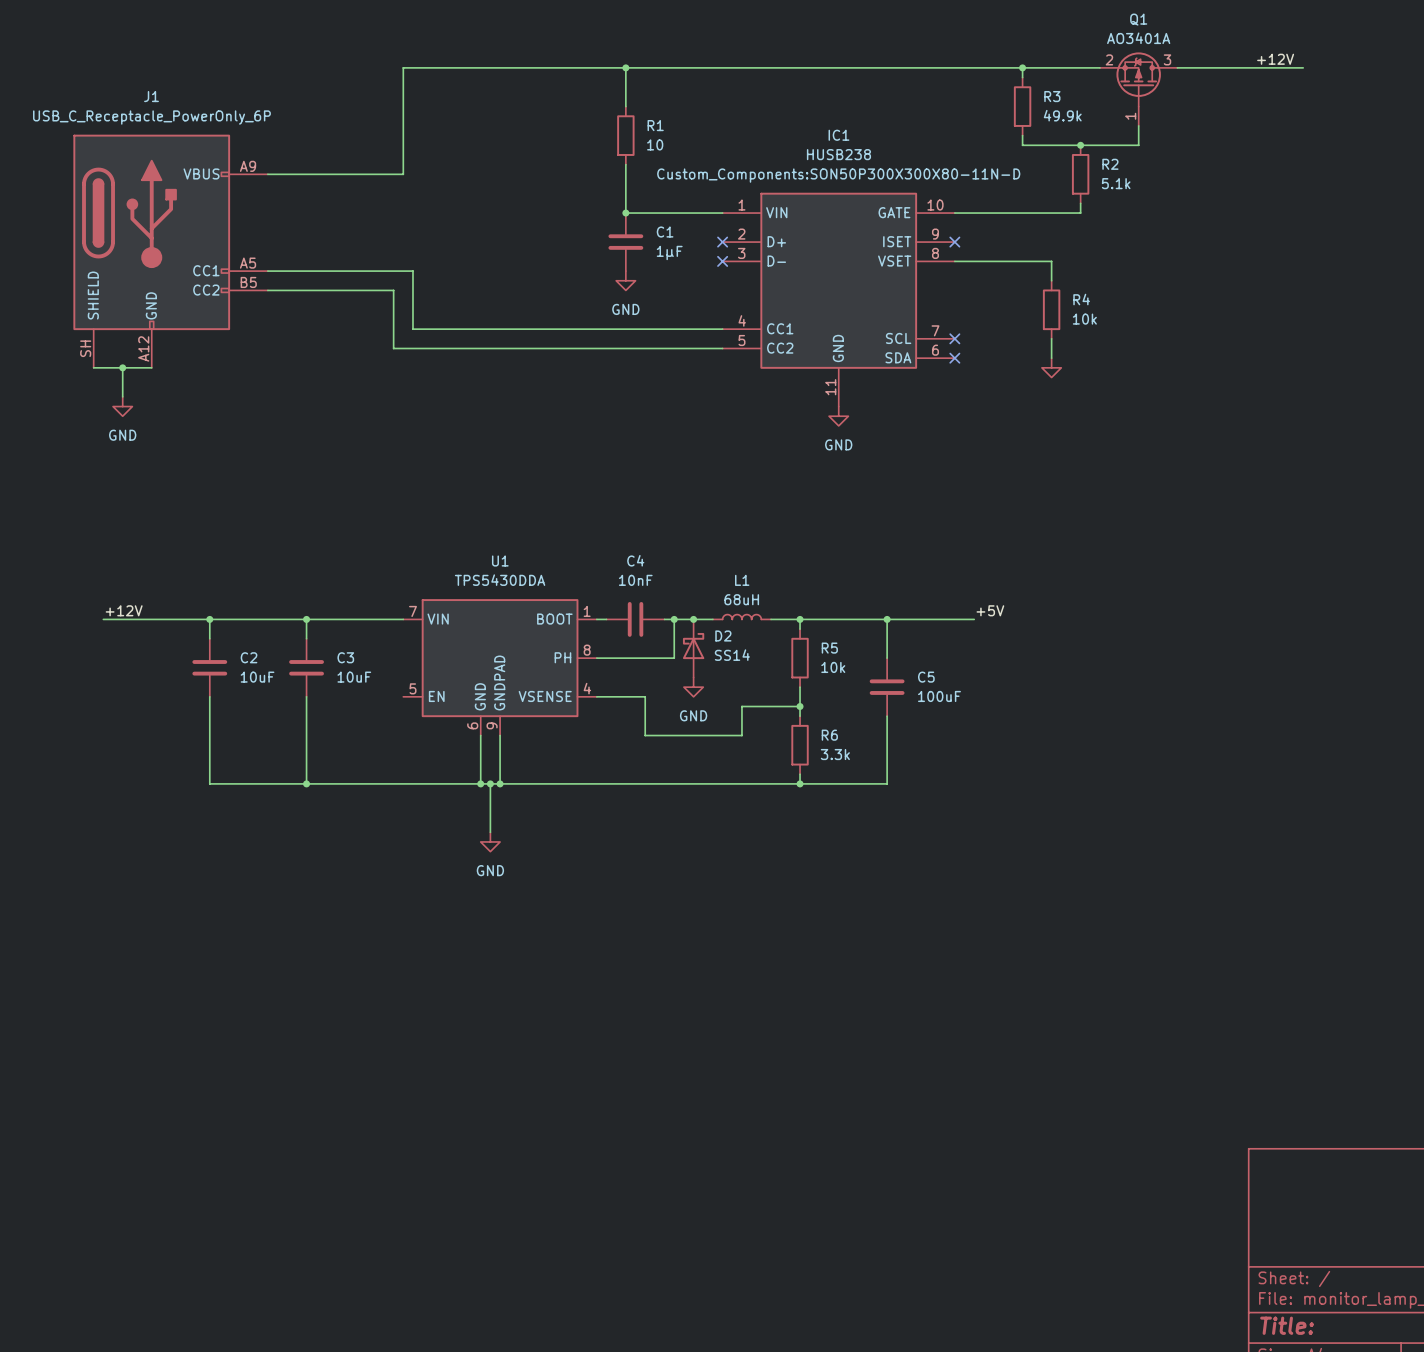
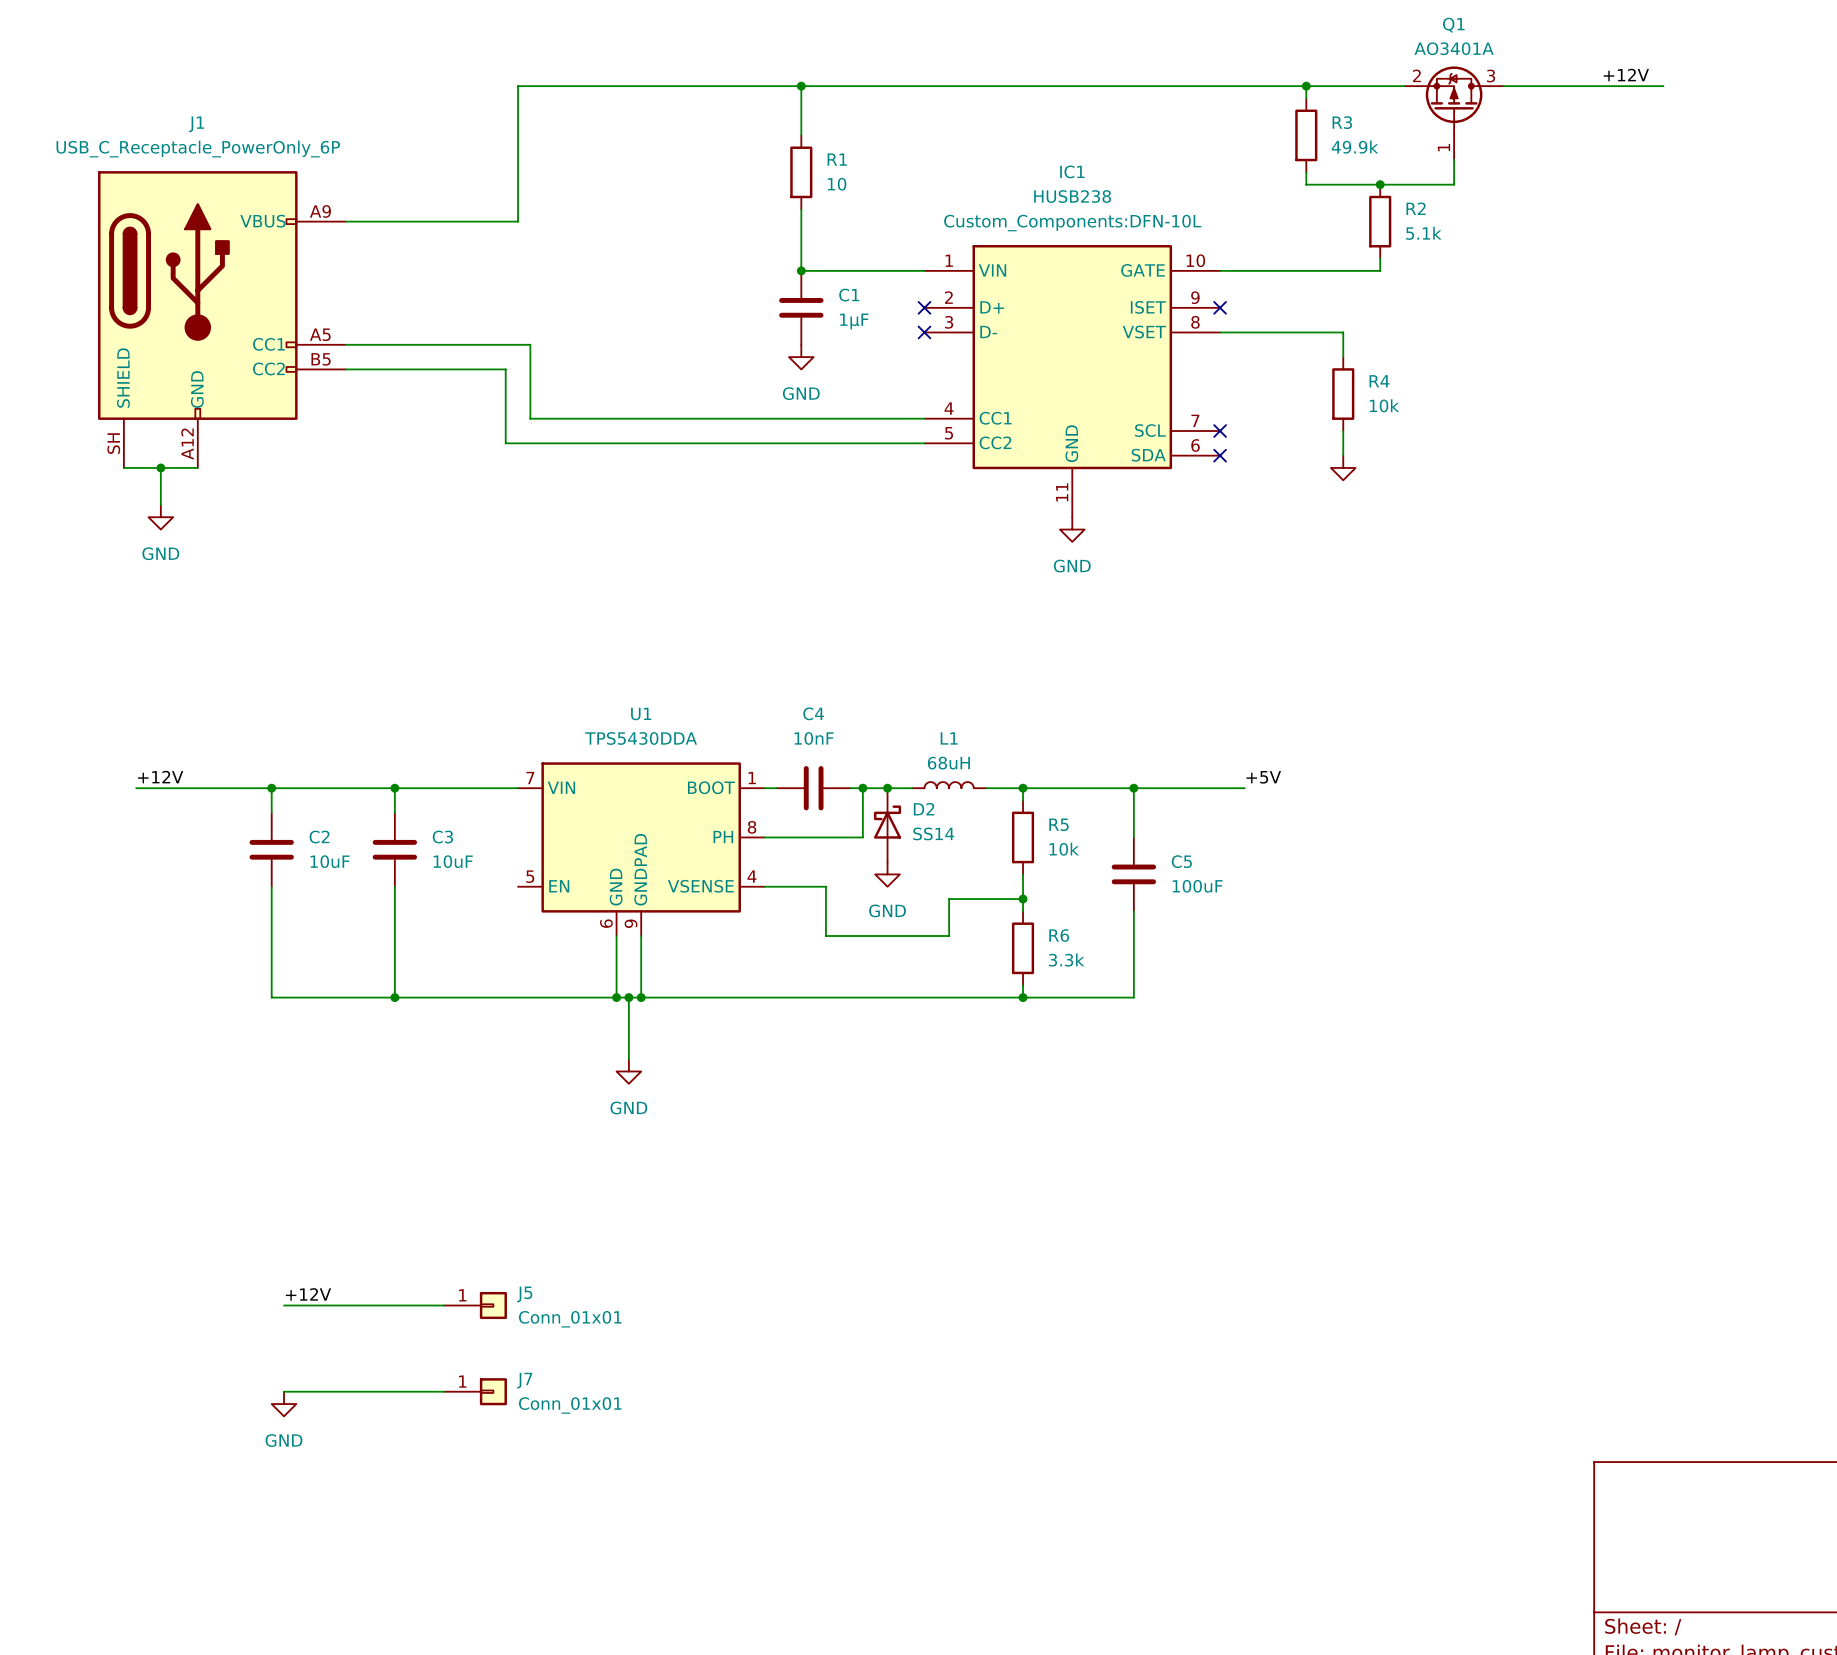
IC1 text: Custom_Components:SON50P300X300X80-11N-D (838, 175) -> Custom_Components:DFN-10L (1072, 223)
label: none -> +12V (308, 1294)
wire: none -> (284, 1305) (444, 1305)
J5: none -> Conn_01x01 (475, 1305)
wire: none -> (284, 1391) (444, 1391)
J7: none -> Conn_01x01 (475, 1391)
power symbol: none -> GND (284, 1404)

